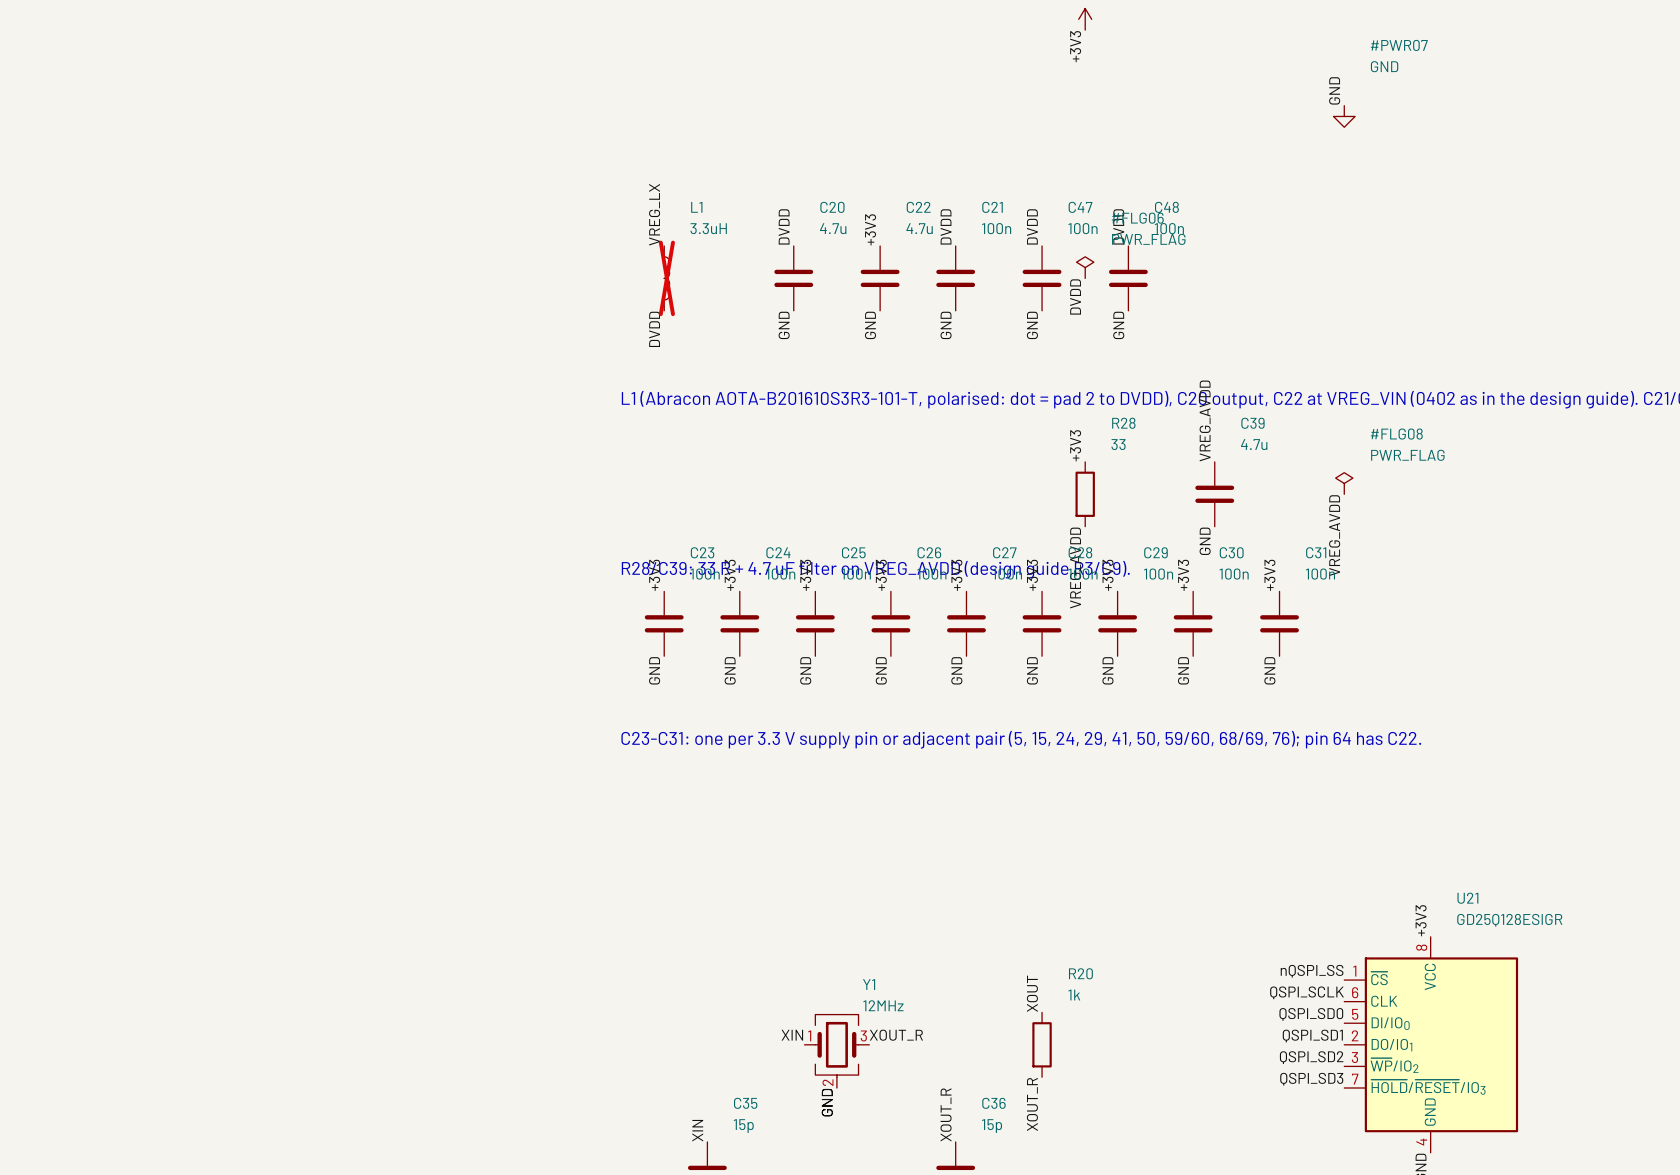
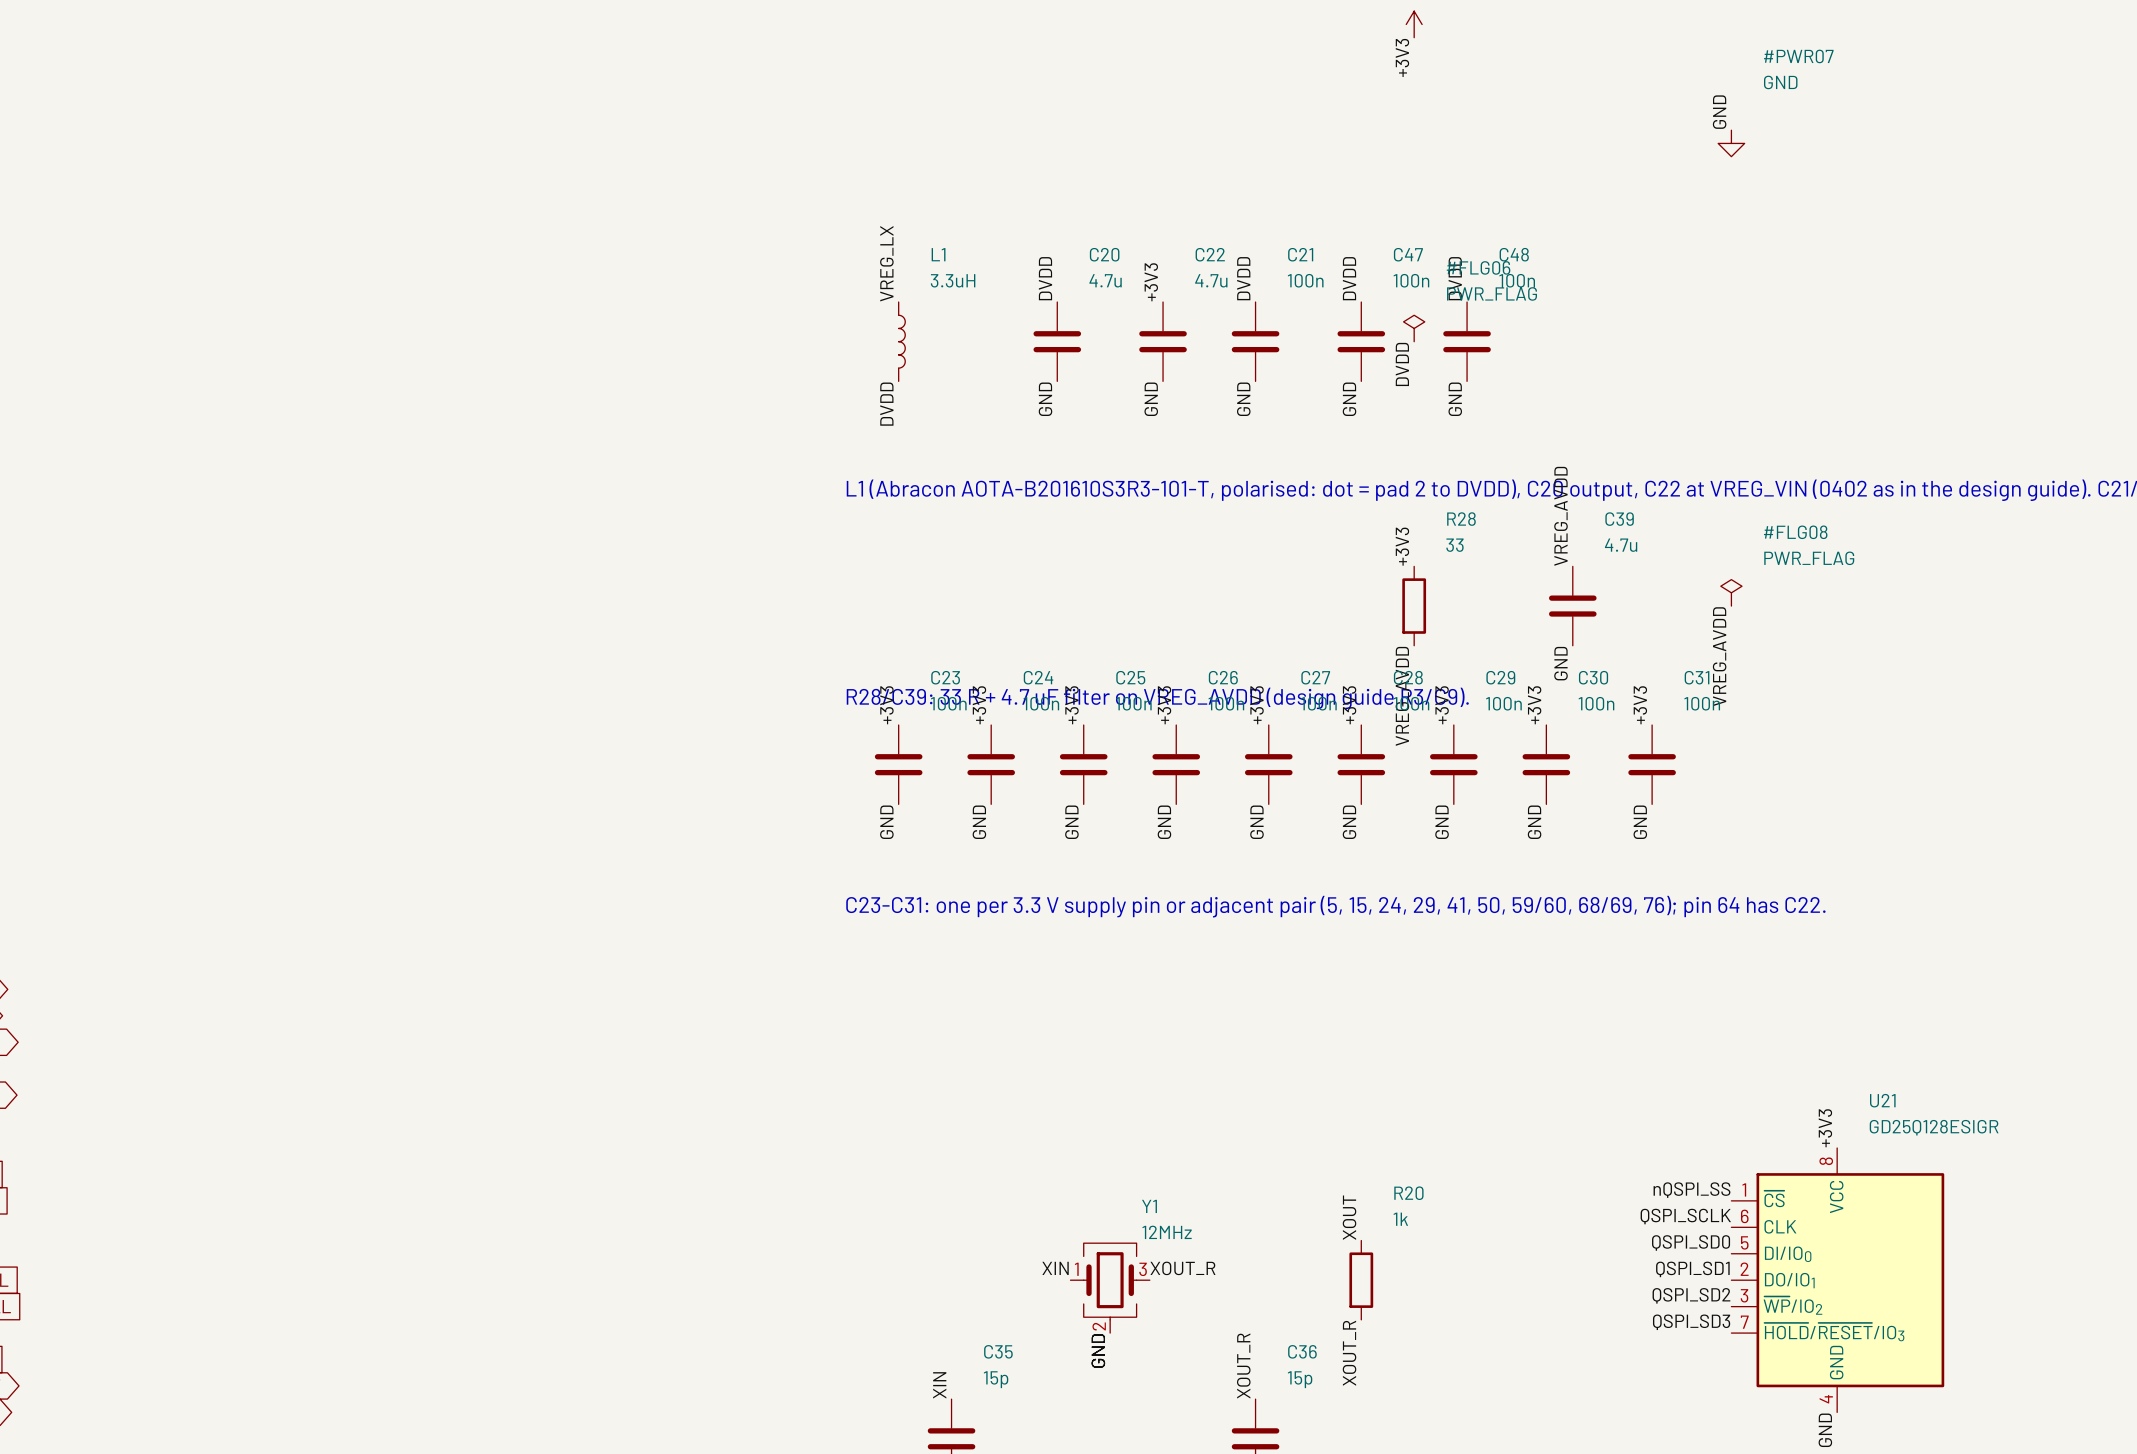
L1 do-not-place cross: (666, 278) -> none

